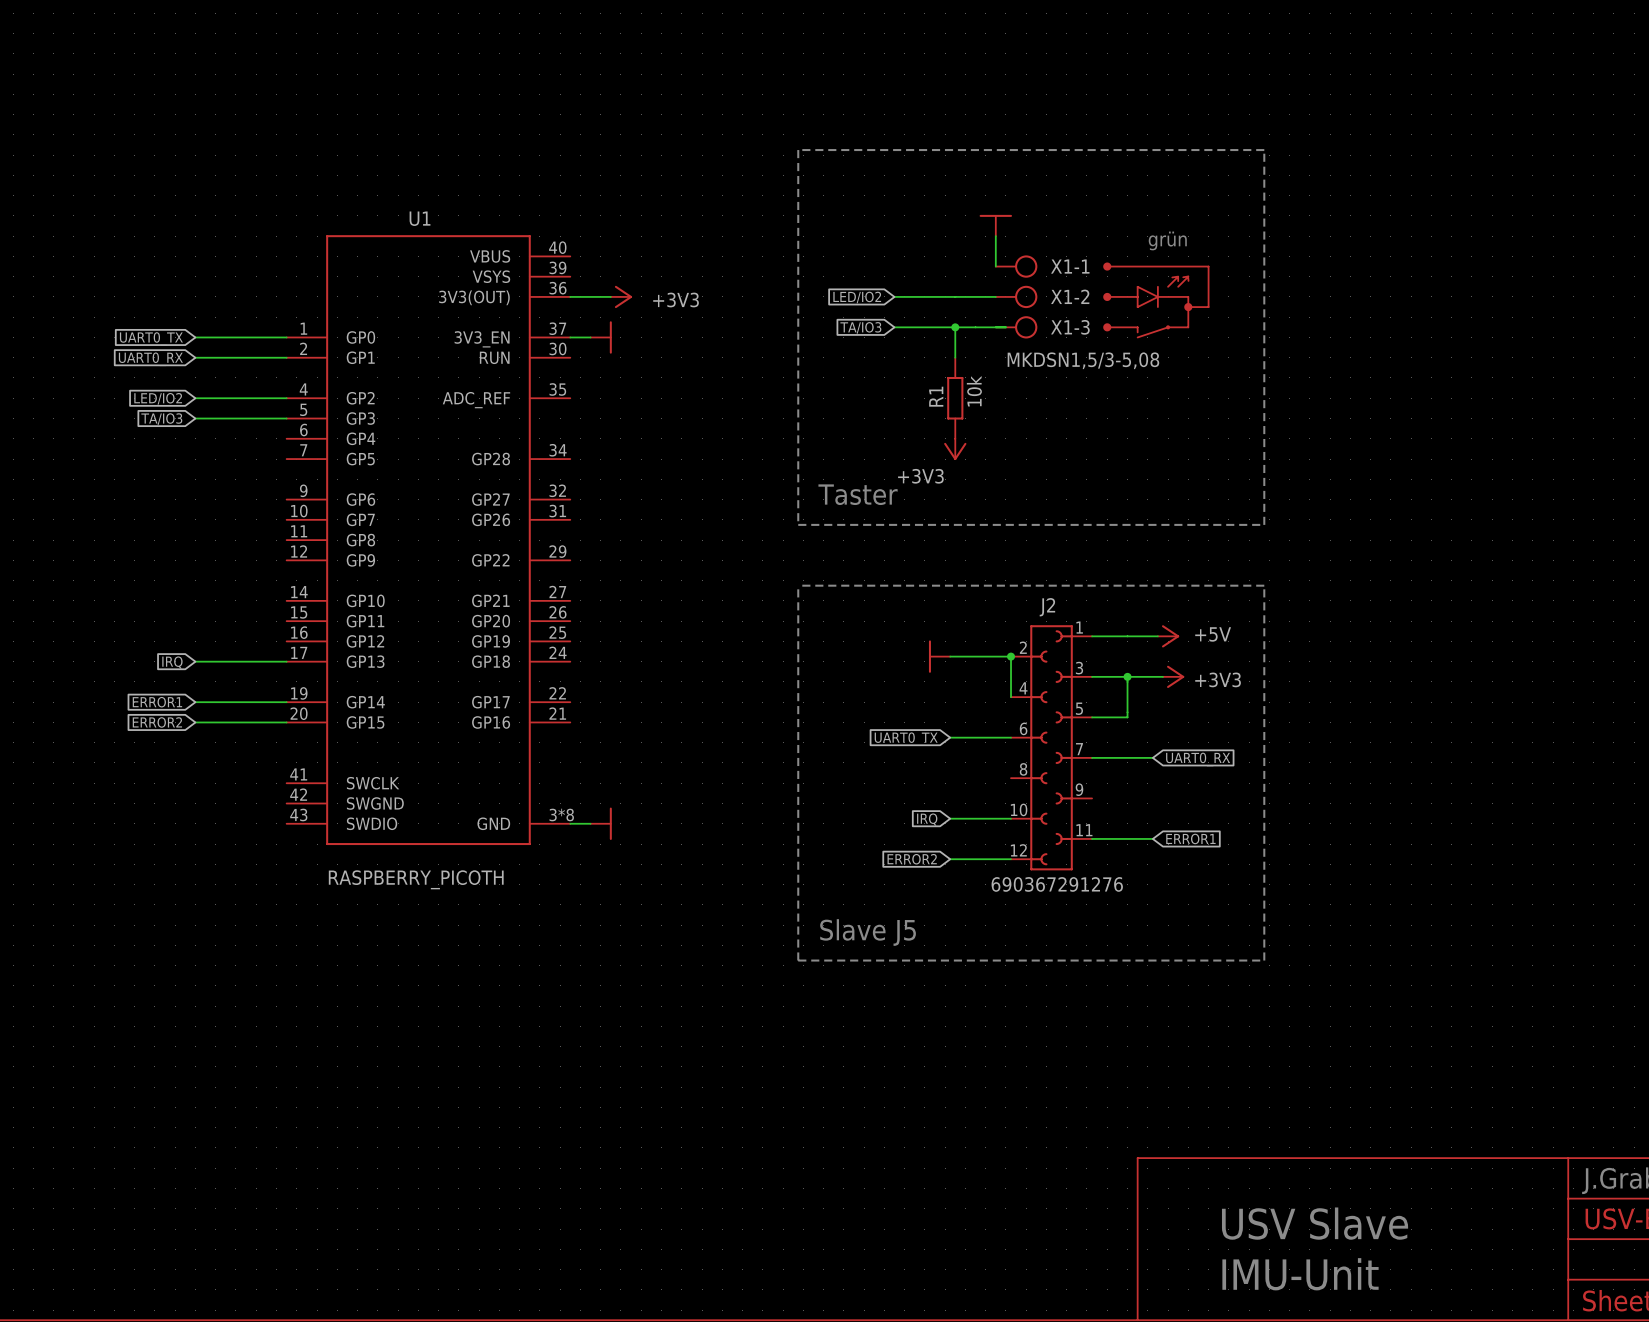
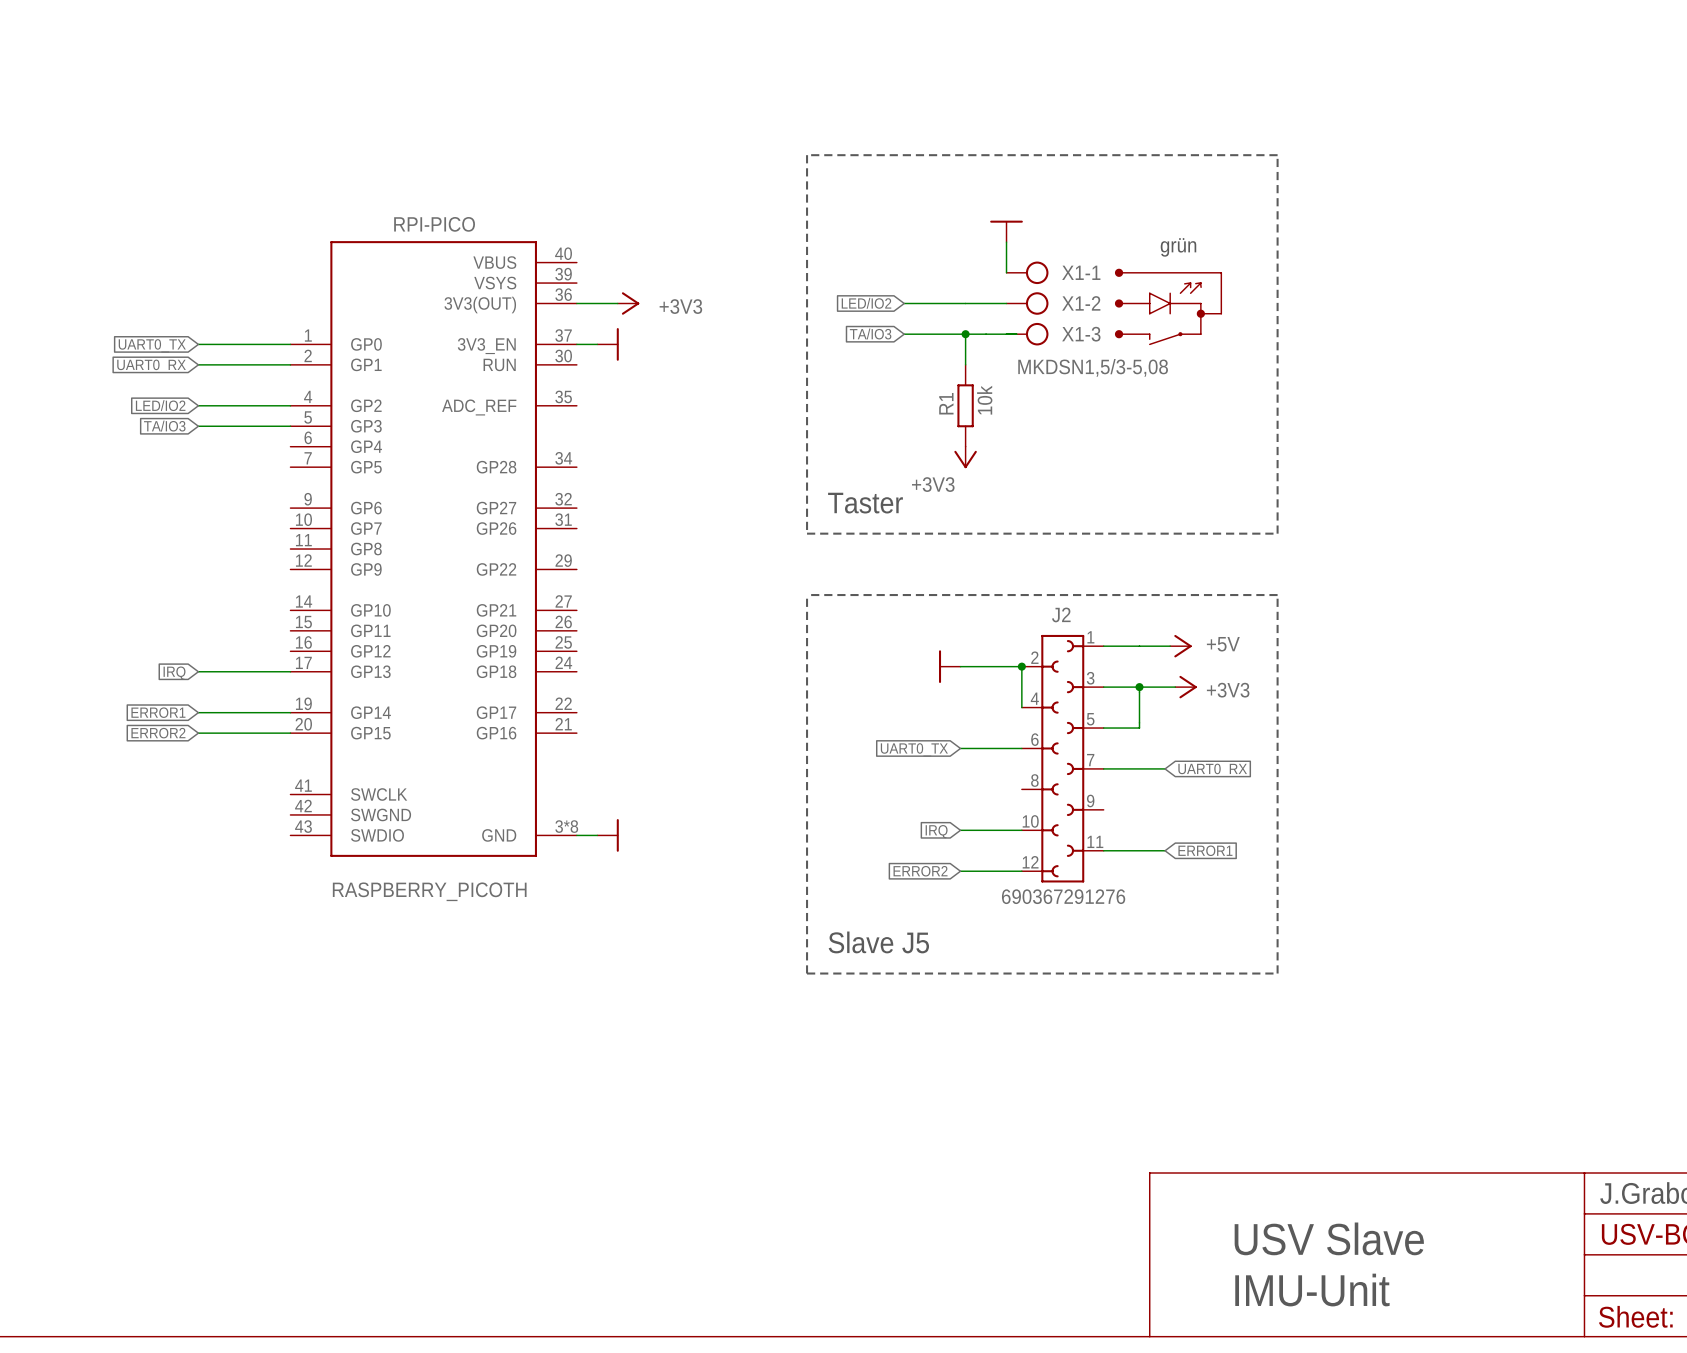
U1 name: U1 (420, 218) -> RPI-PICO (434, 224)

